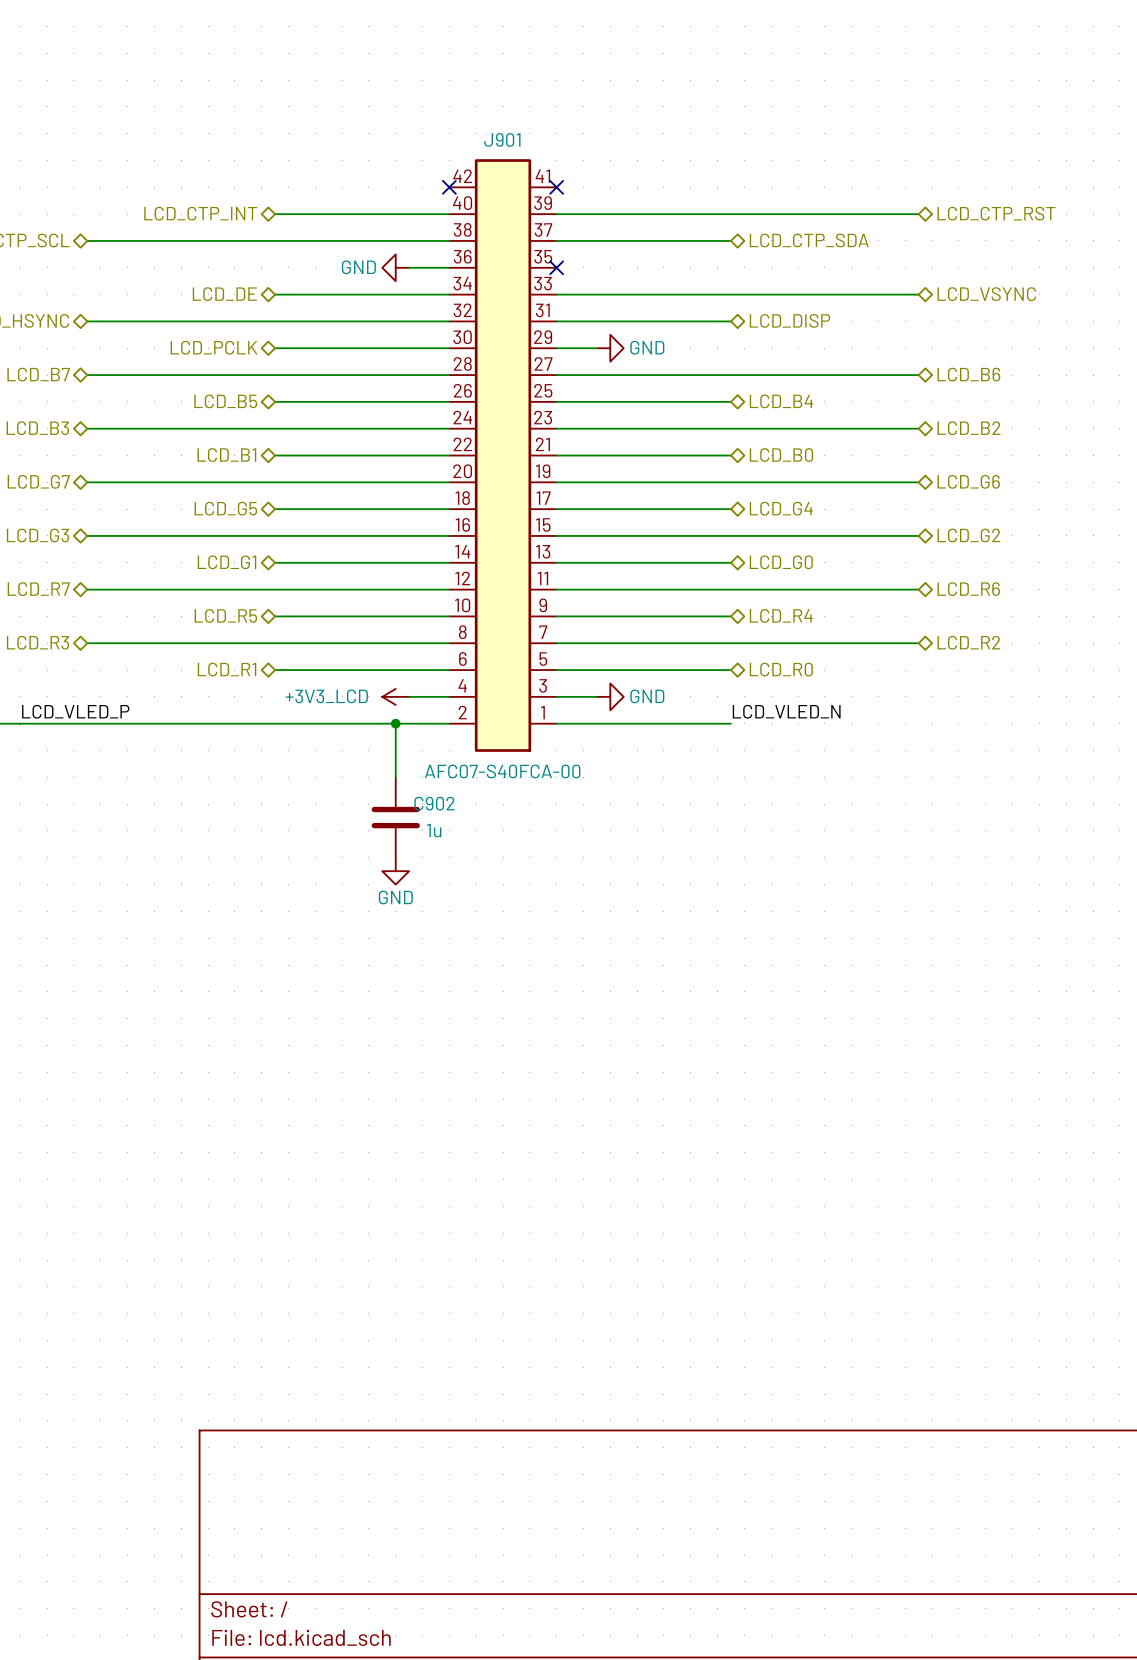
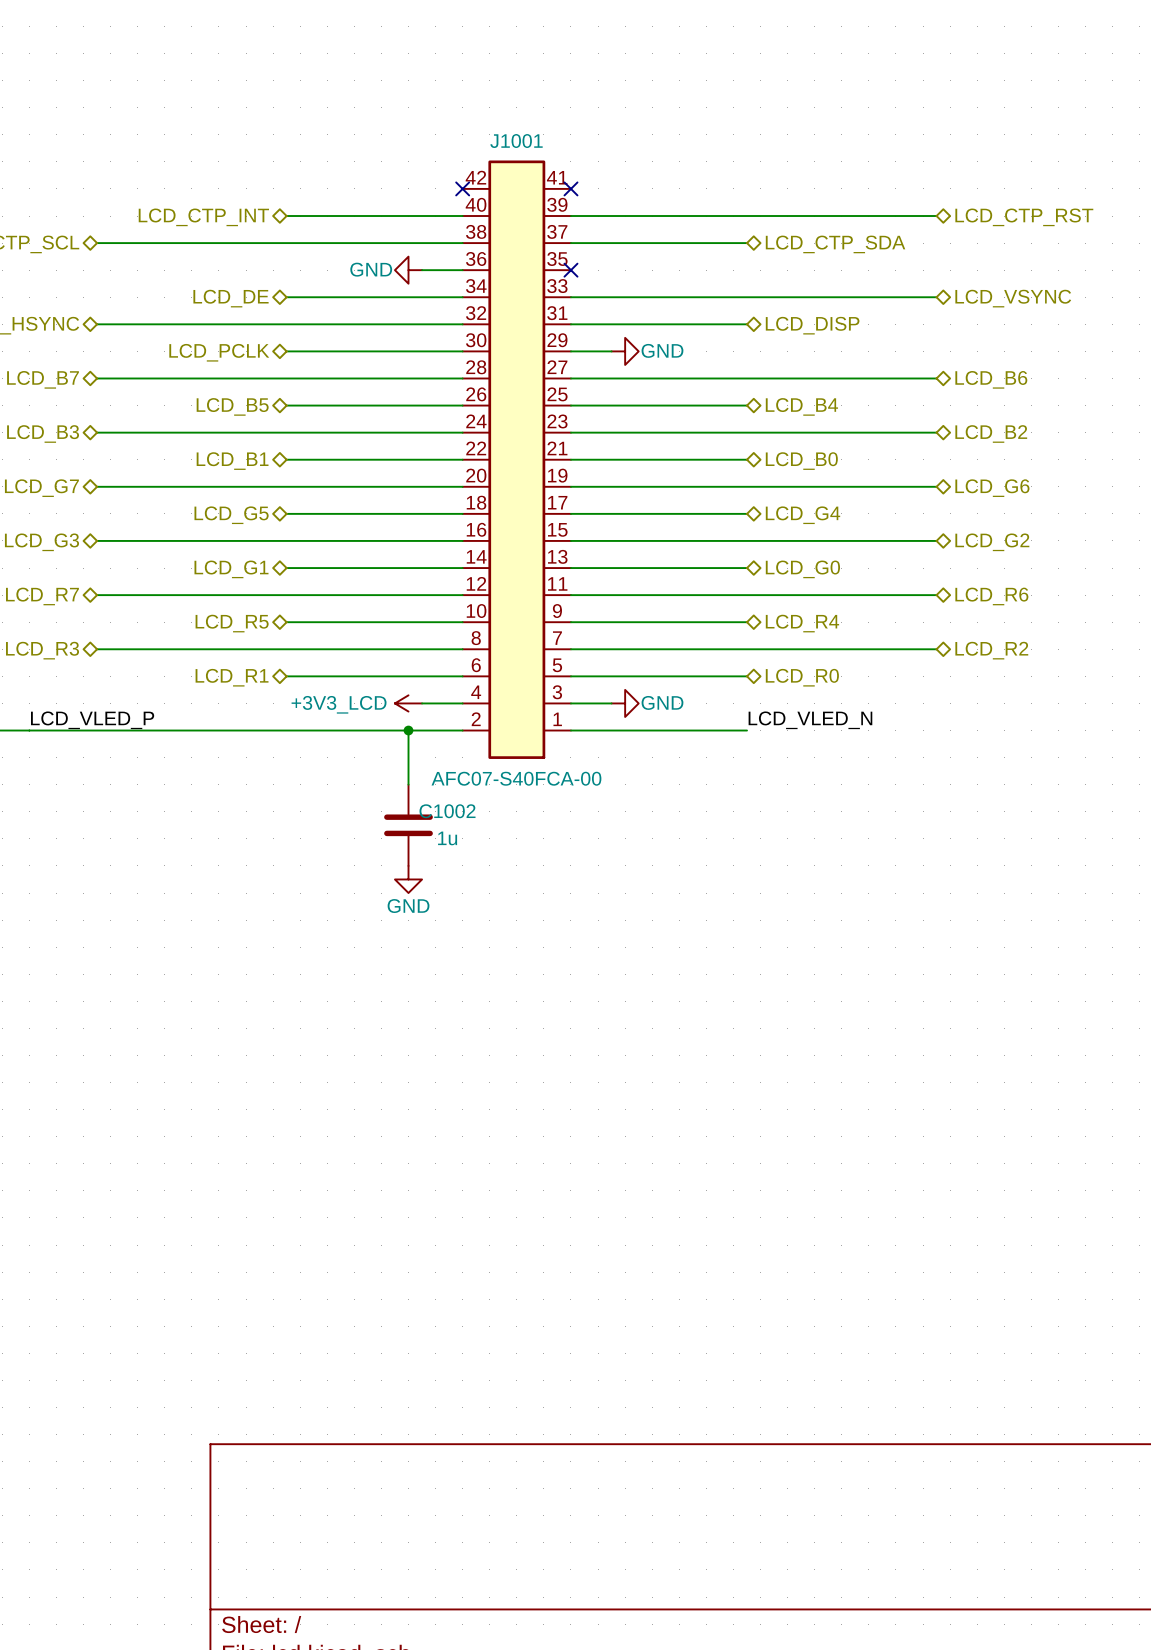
J901 name: J901 (502, 139) -> J1001 (516, 141)
C902 name: C902 (434, 803) -> C1002 (447, 811)

